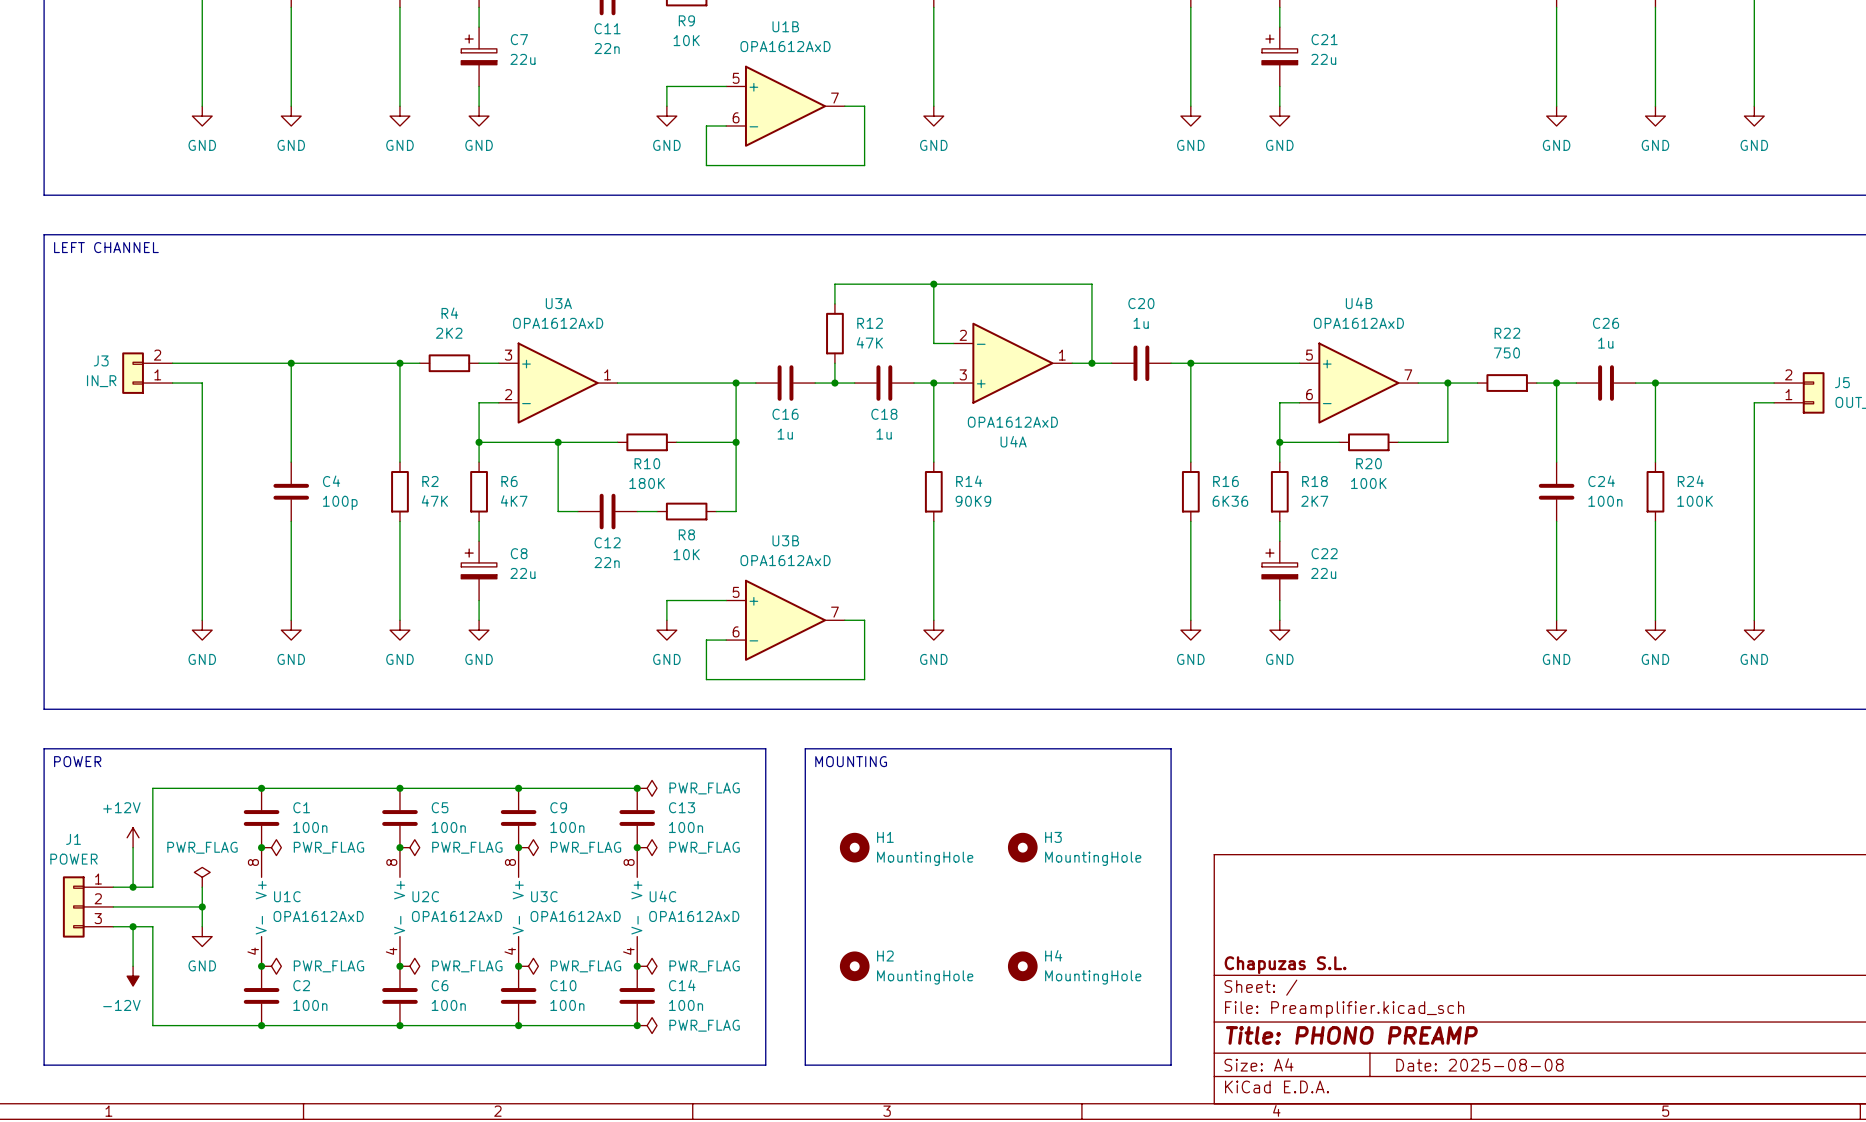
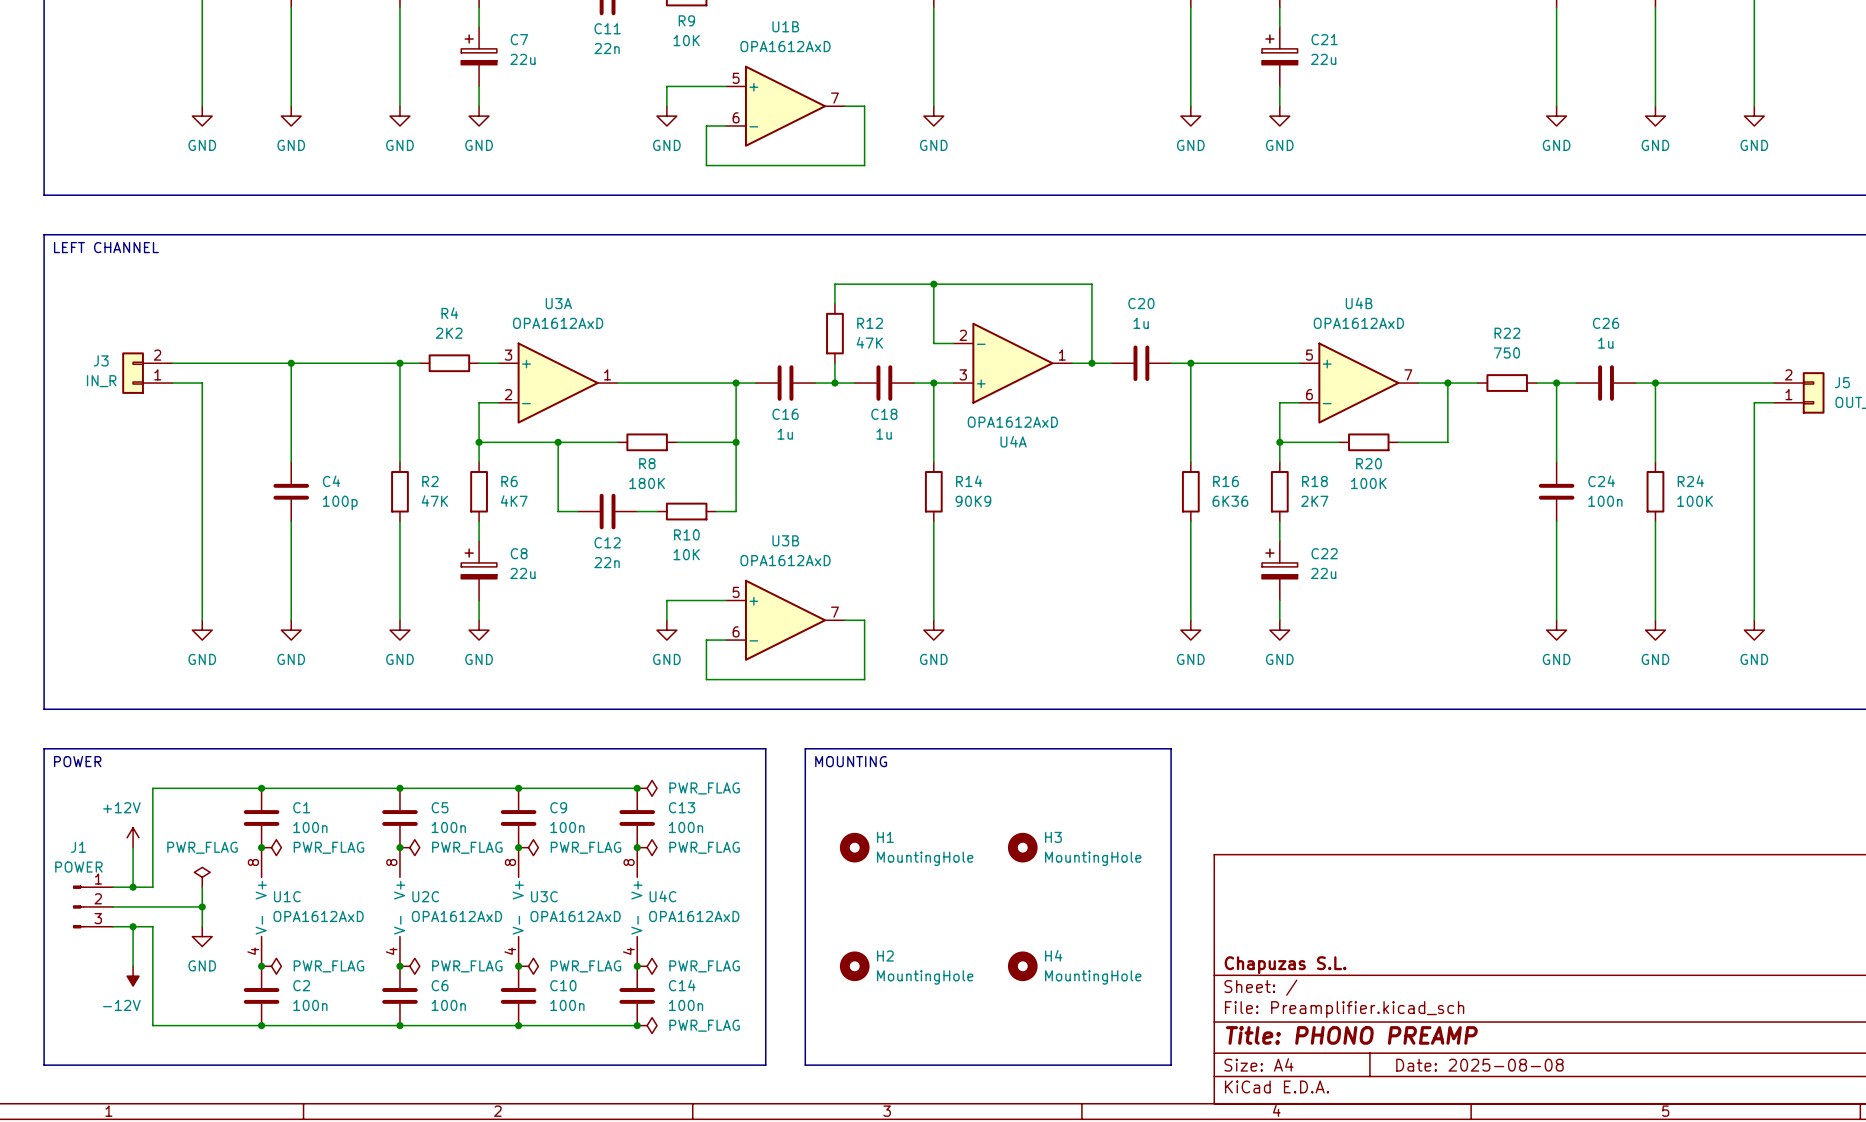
R10 name: R10 (647, 463) -> R8 (647, 463)
R8 name: R8 (686, 534) -> R10 (686, 534)
J1 symbol: [62, 876, 114, 938] -> [73, 885, 114, 929]

